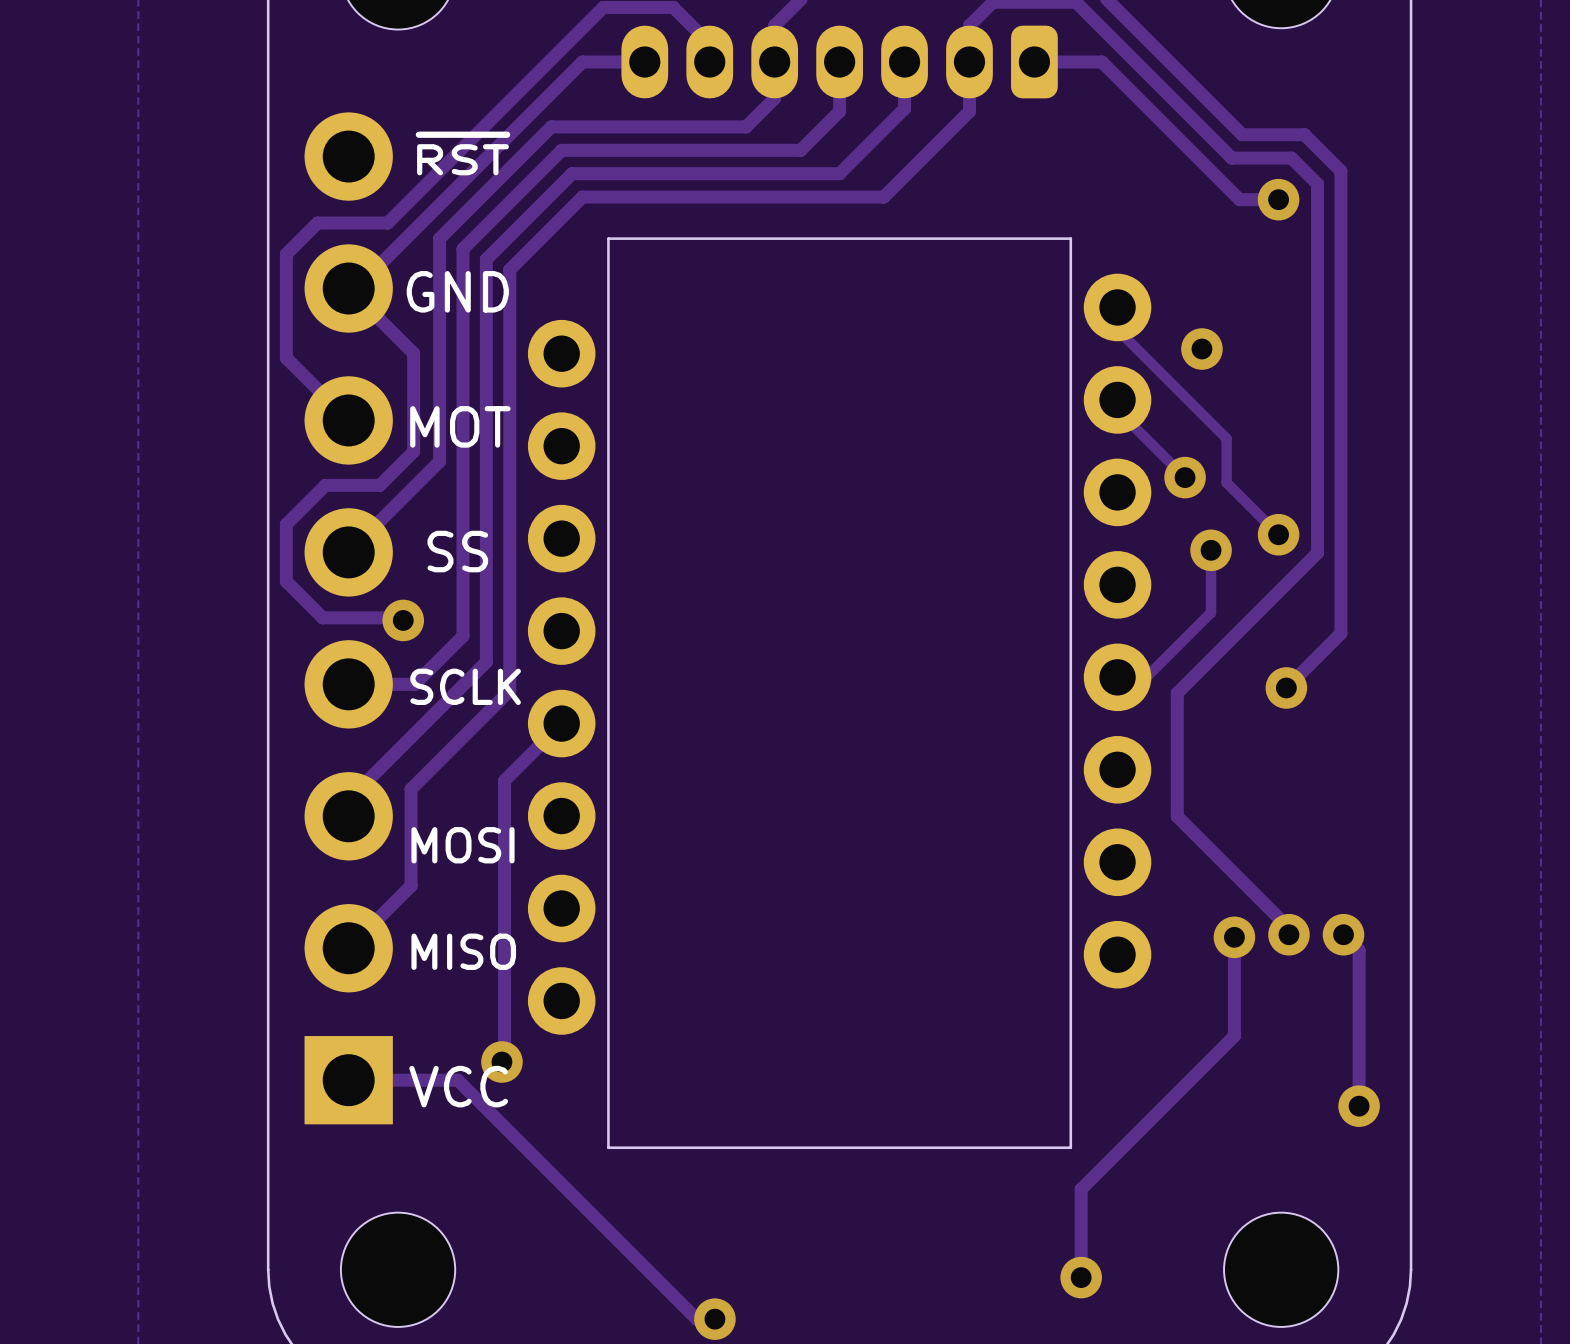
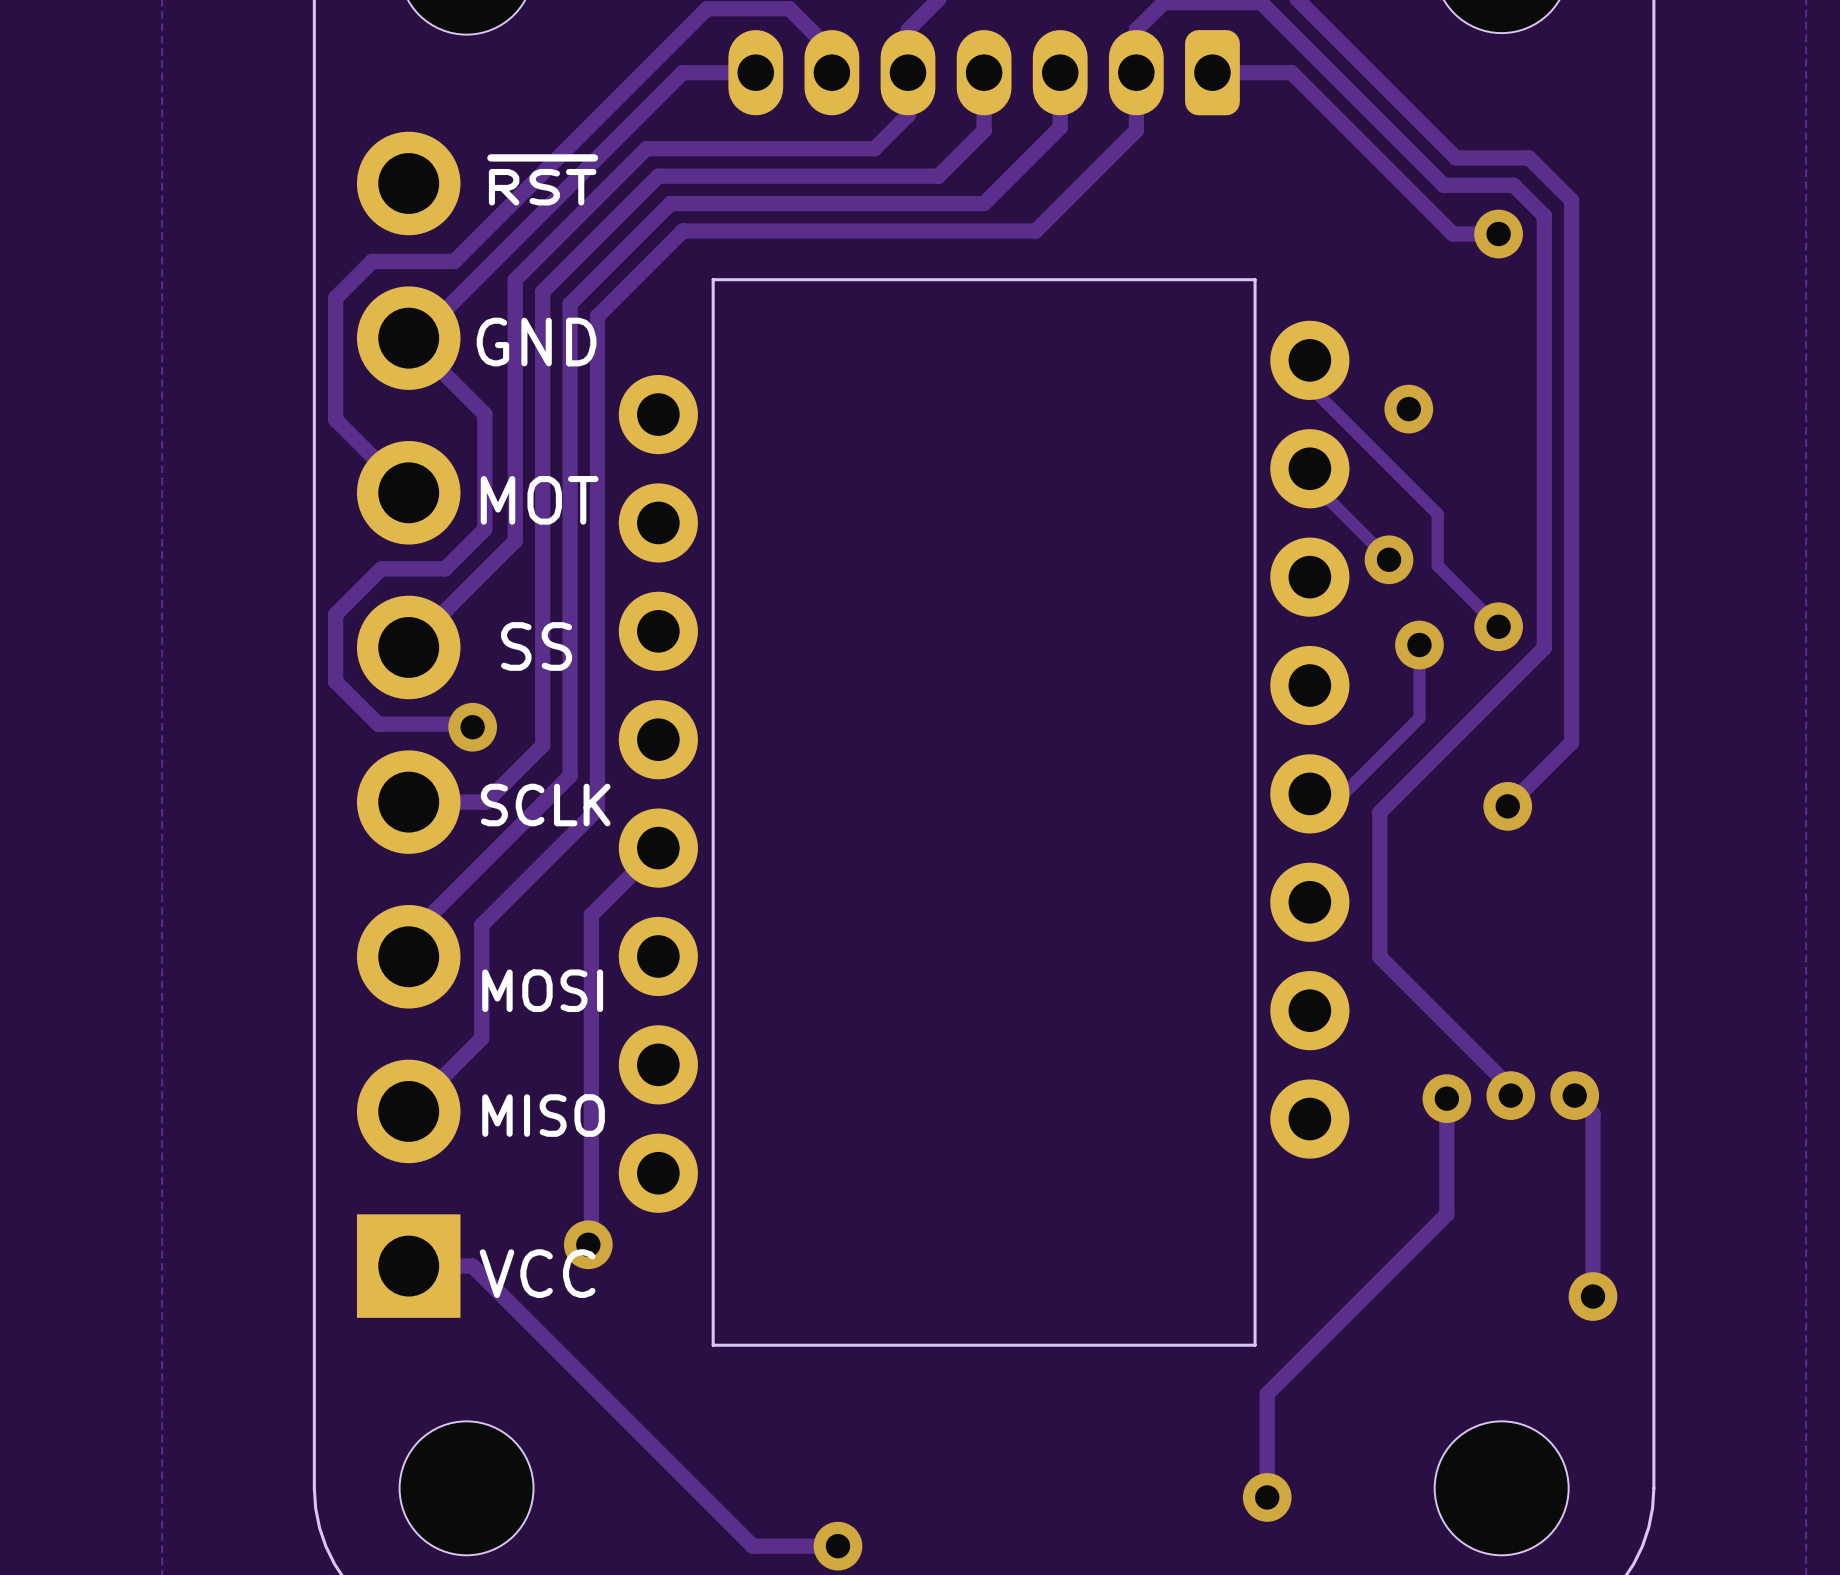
track: (403, 1080) (457, 1080) (696, 1319) -> (472, 1266) (752, 1546) (816, 1546)

